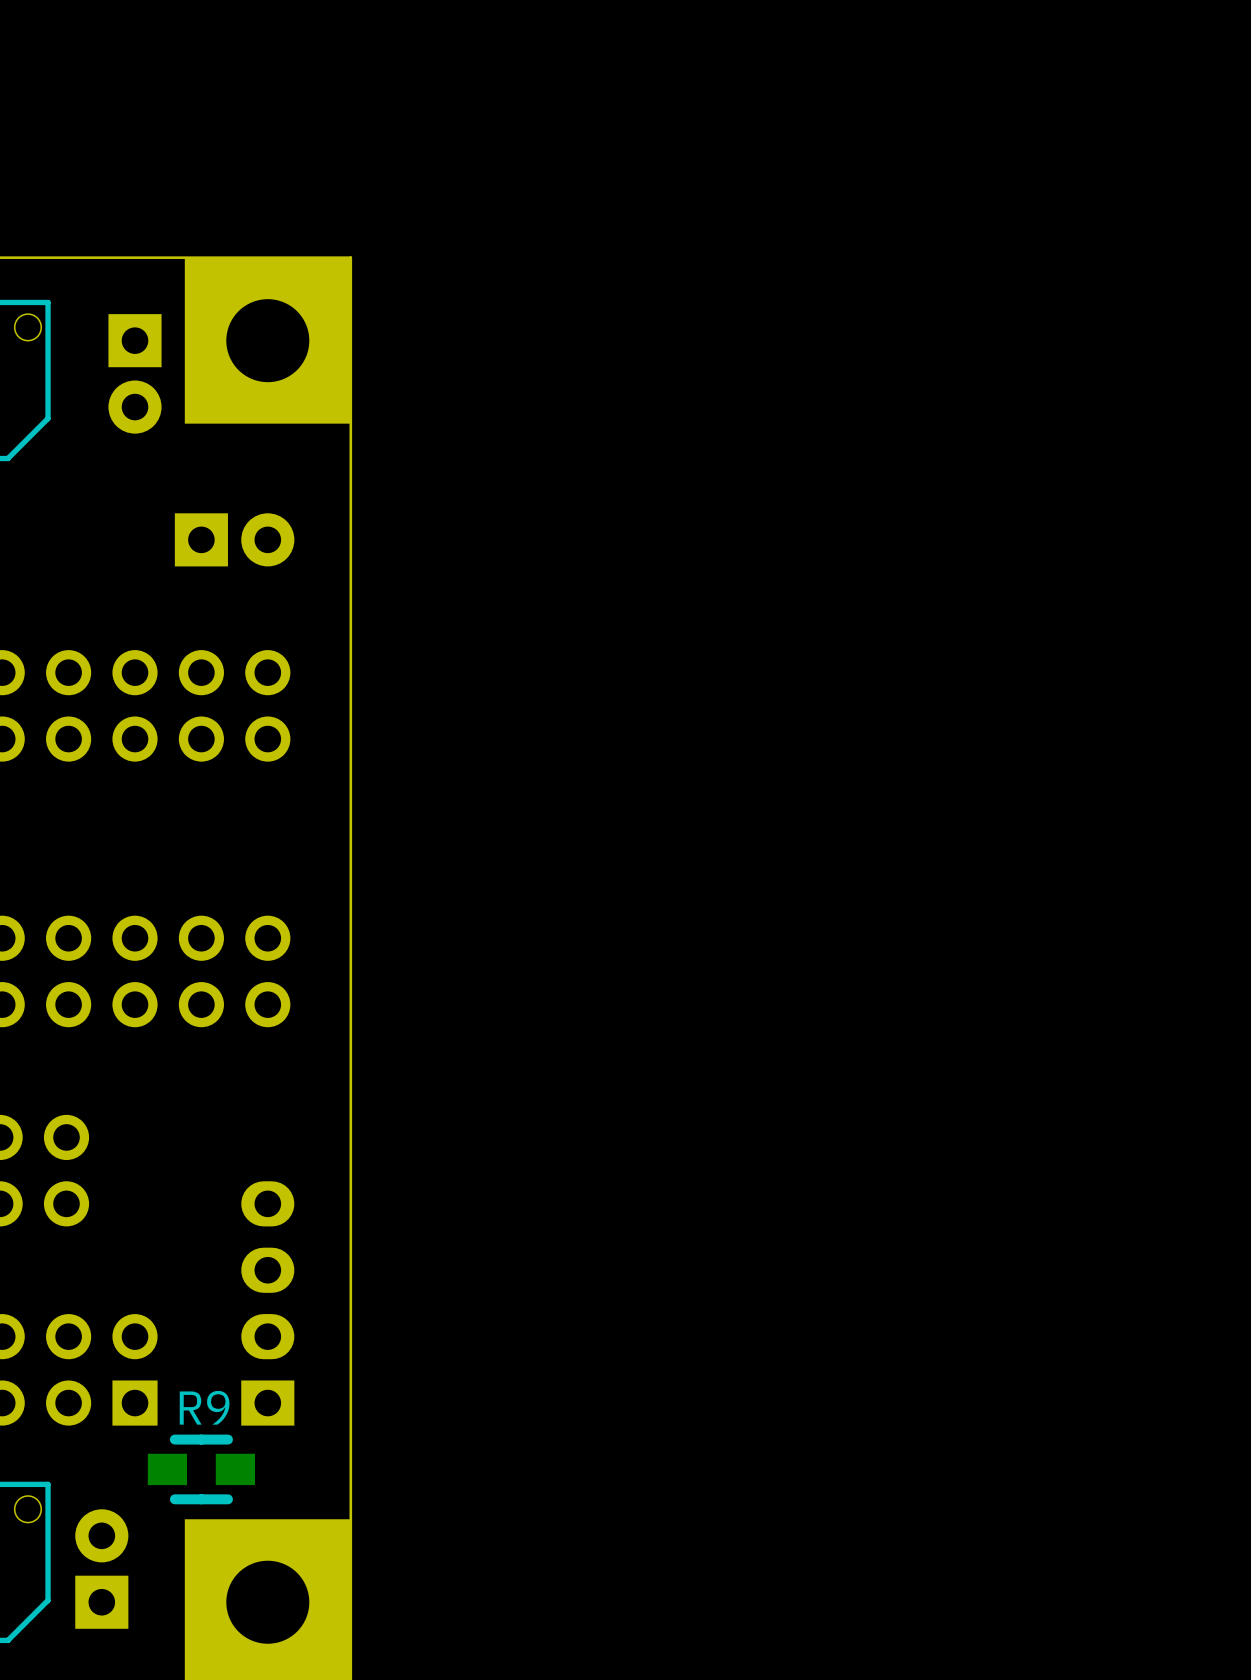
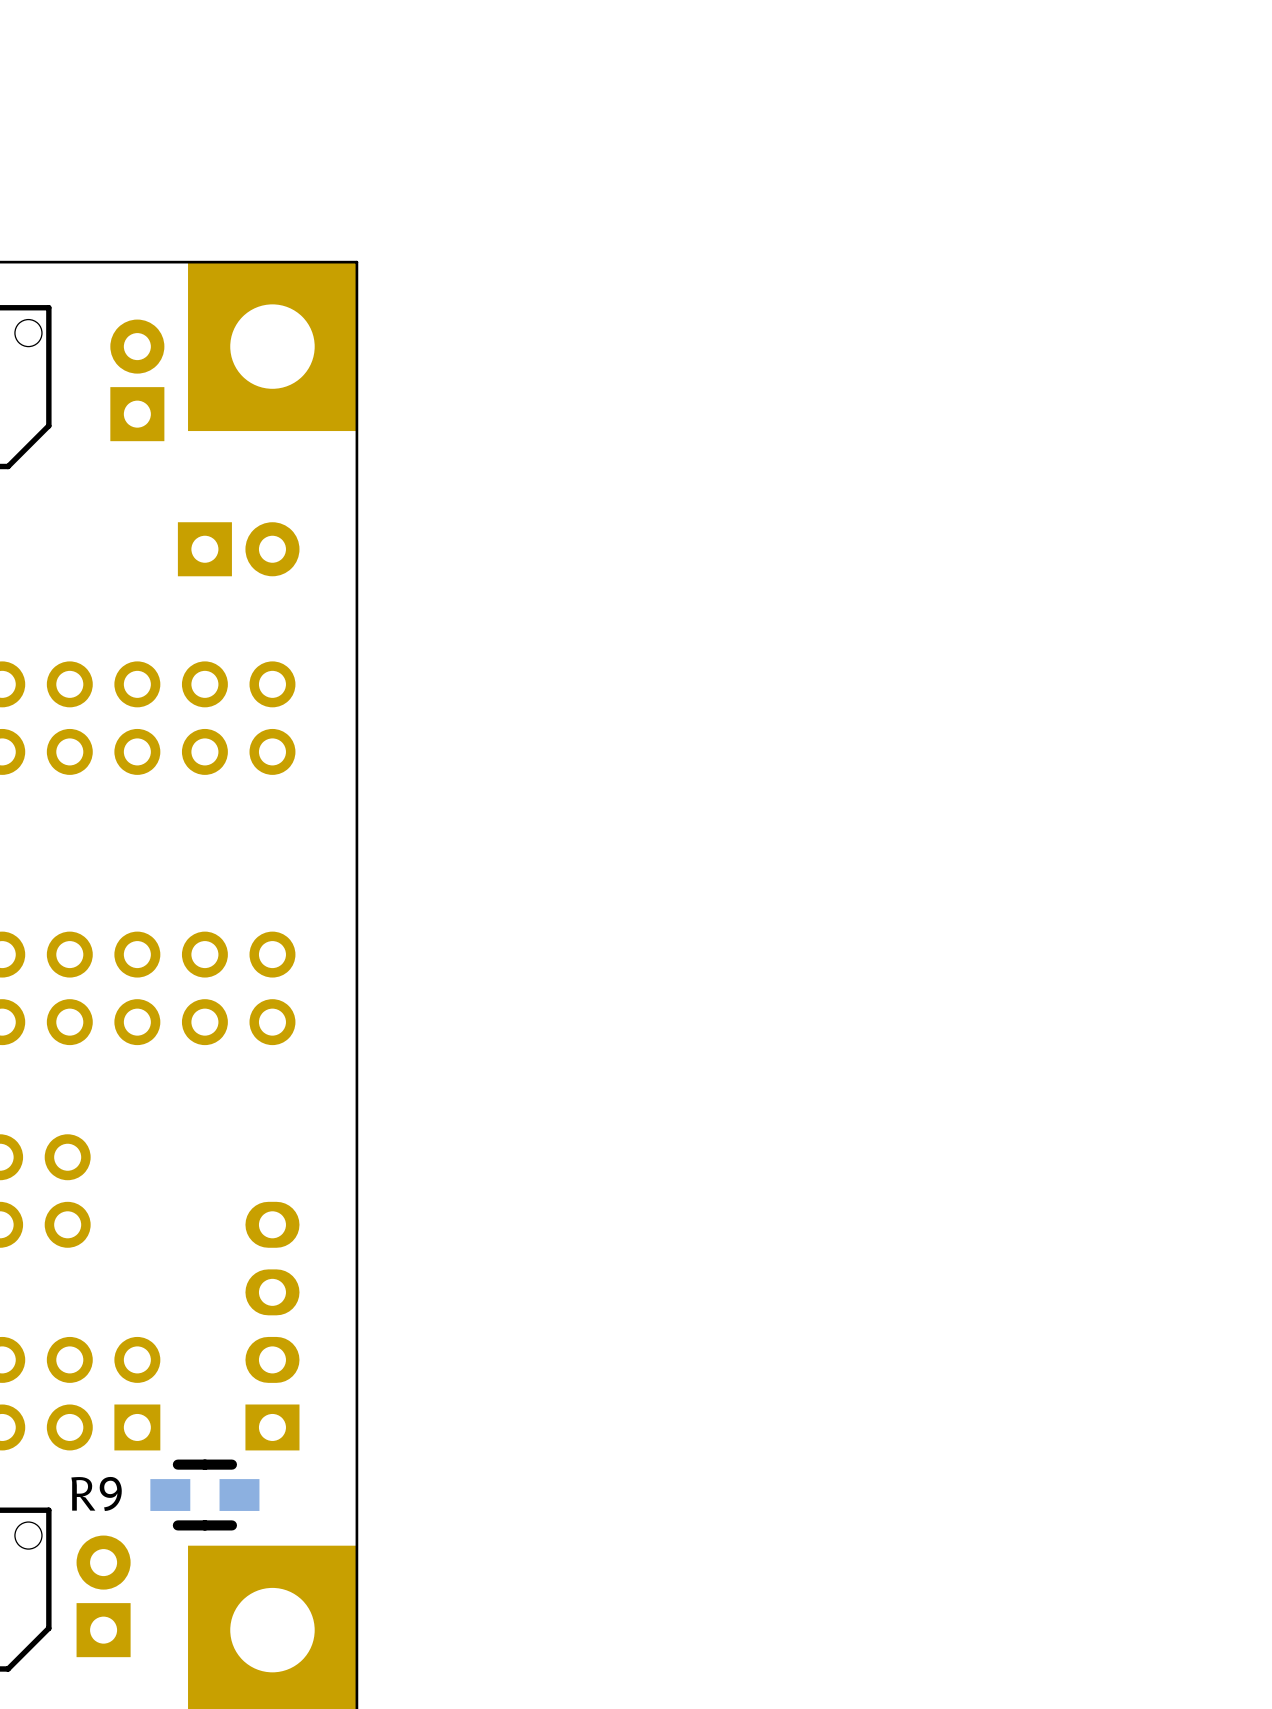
part rotation: 0° (135, 373) -> 180° (137, 380)
R9 name position: R9 (204, 1407) -> R9 (96, 1493)

